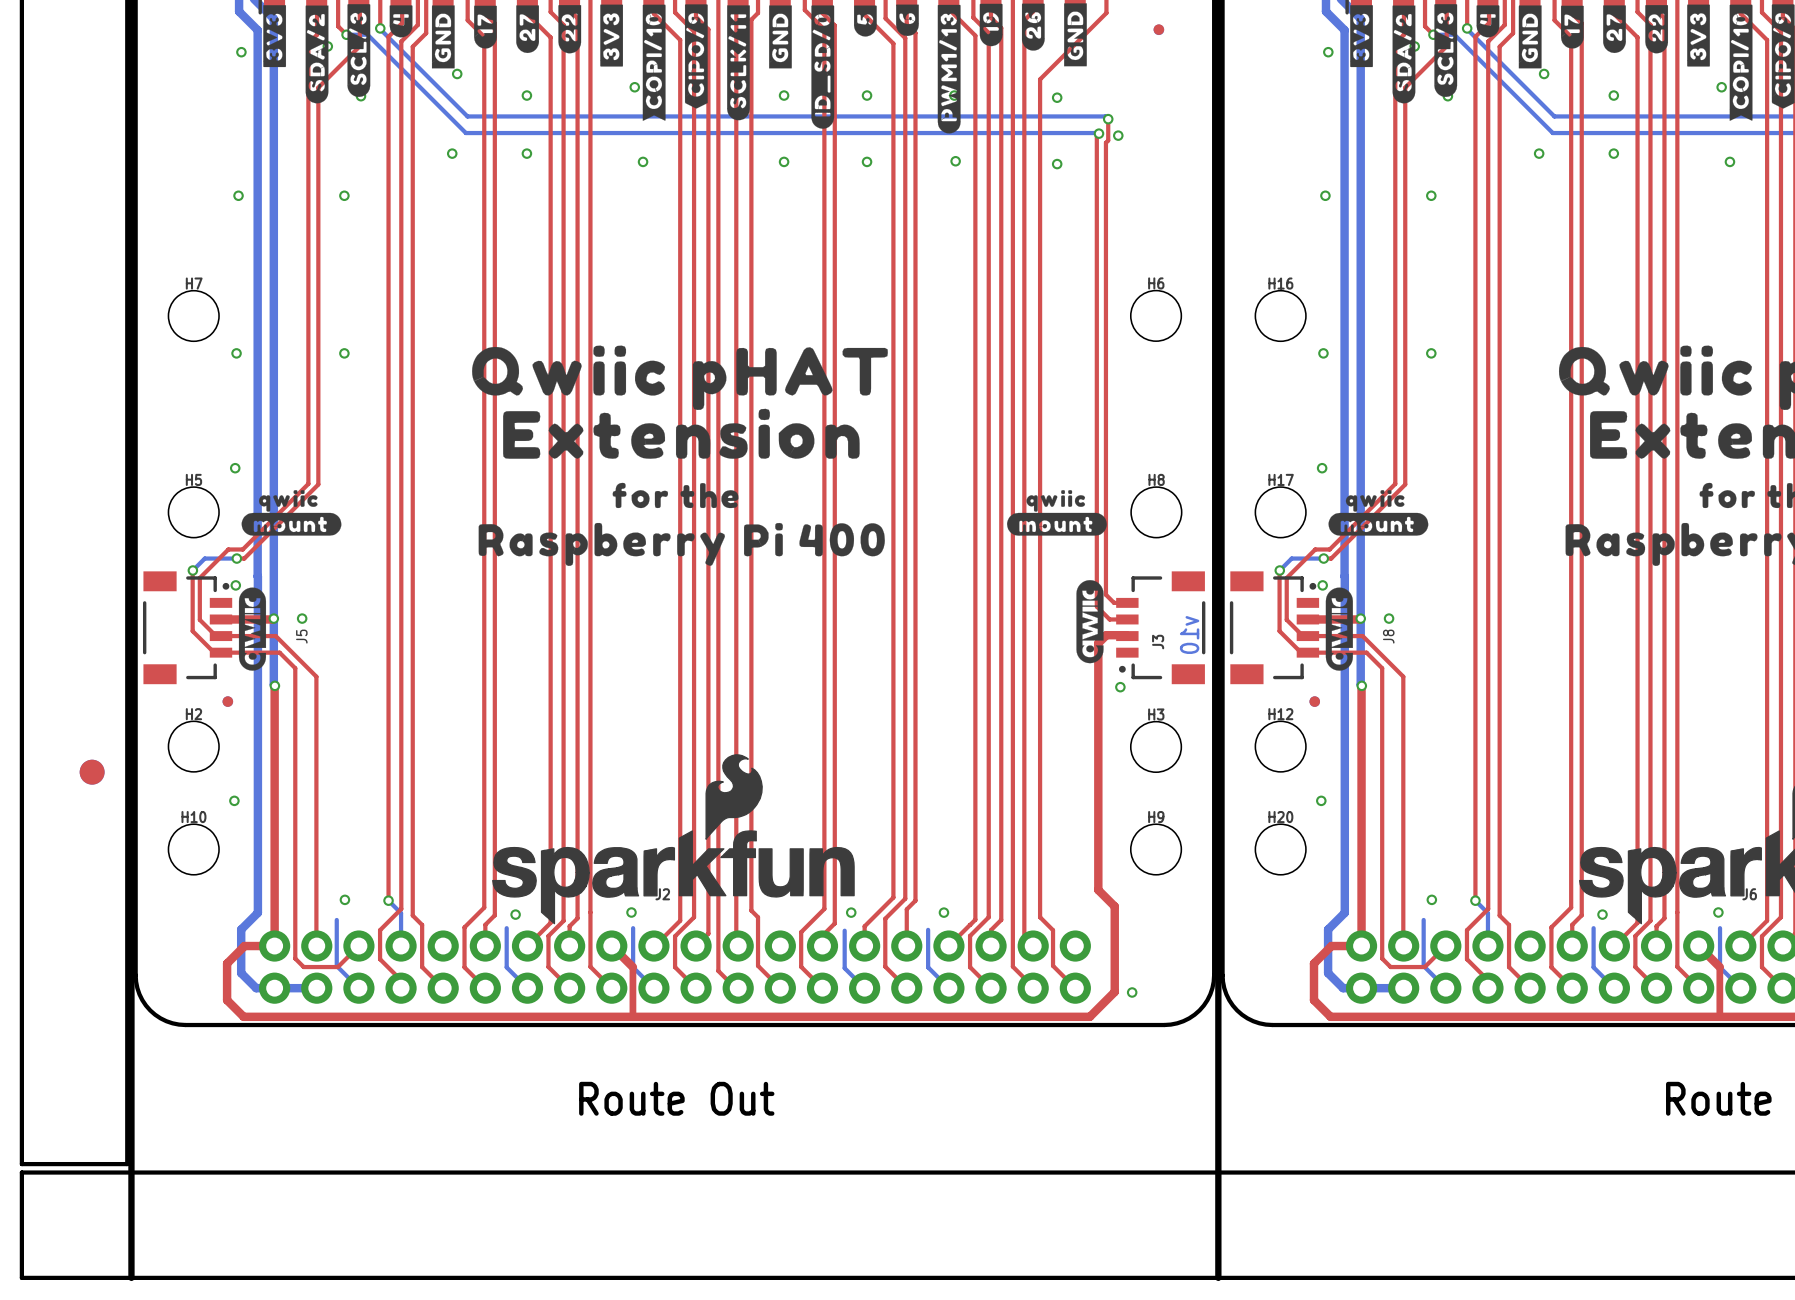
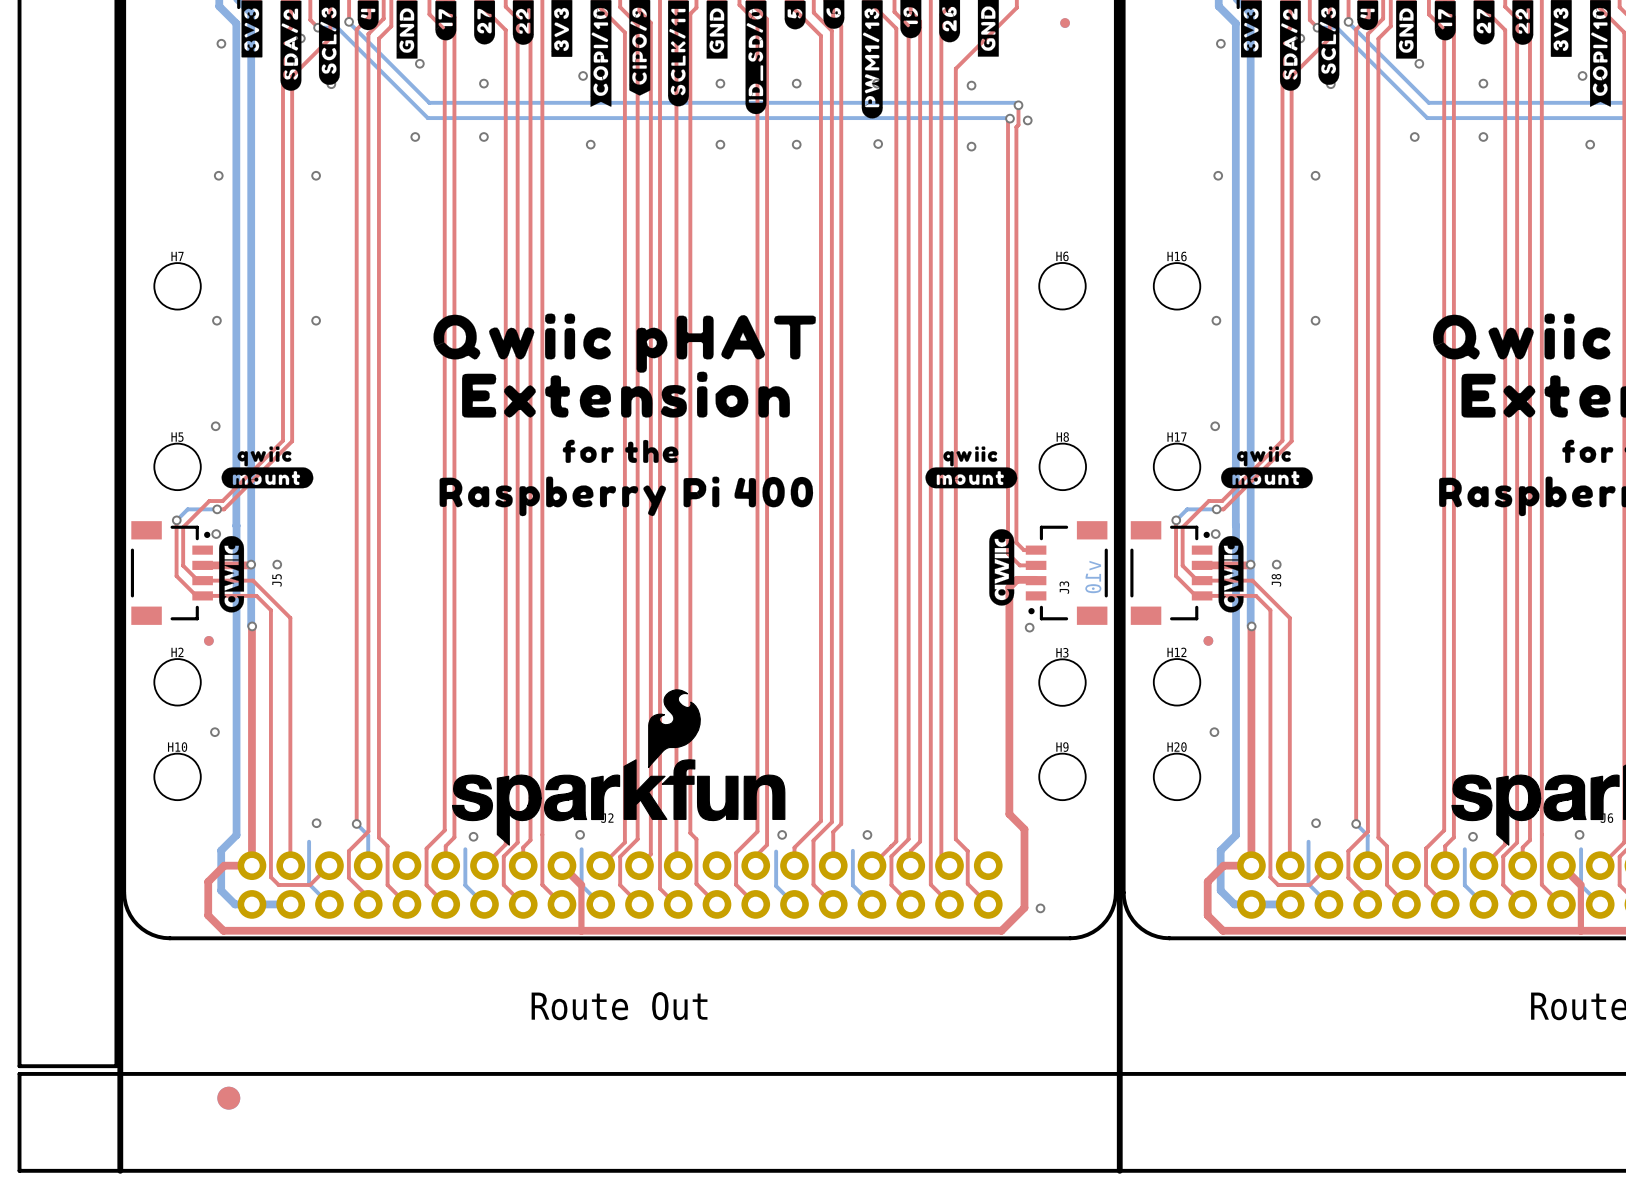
part: (92, 772) -> none
part: none -> (228, 1098)

